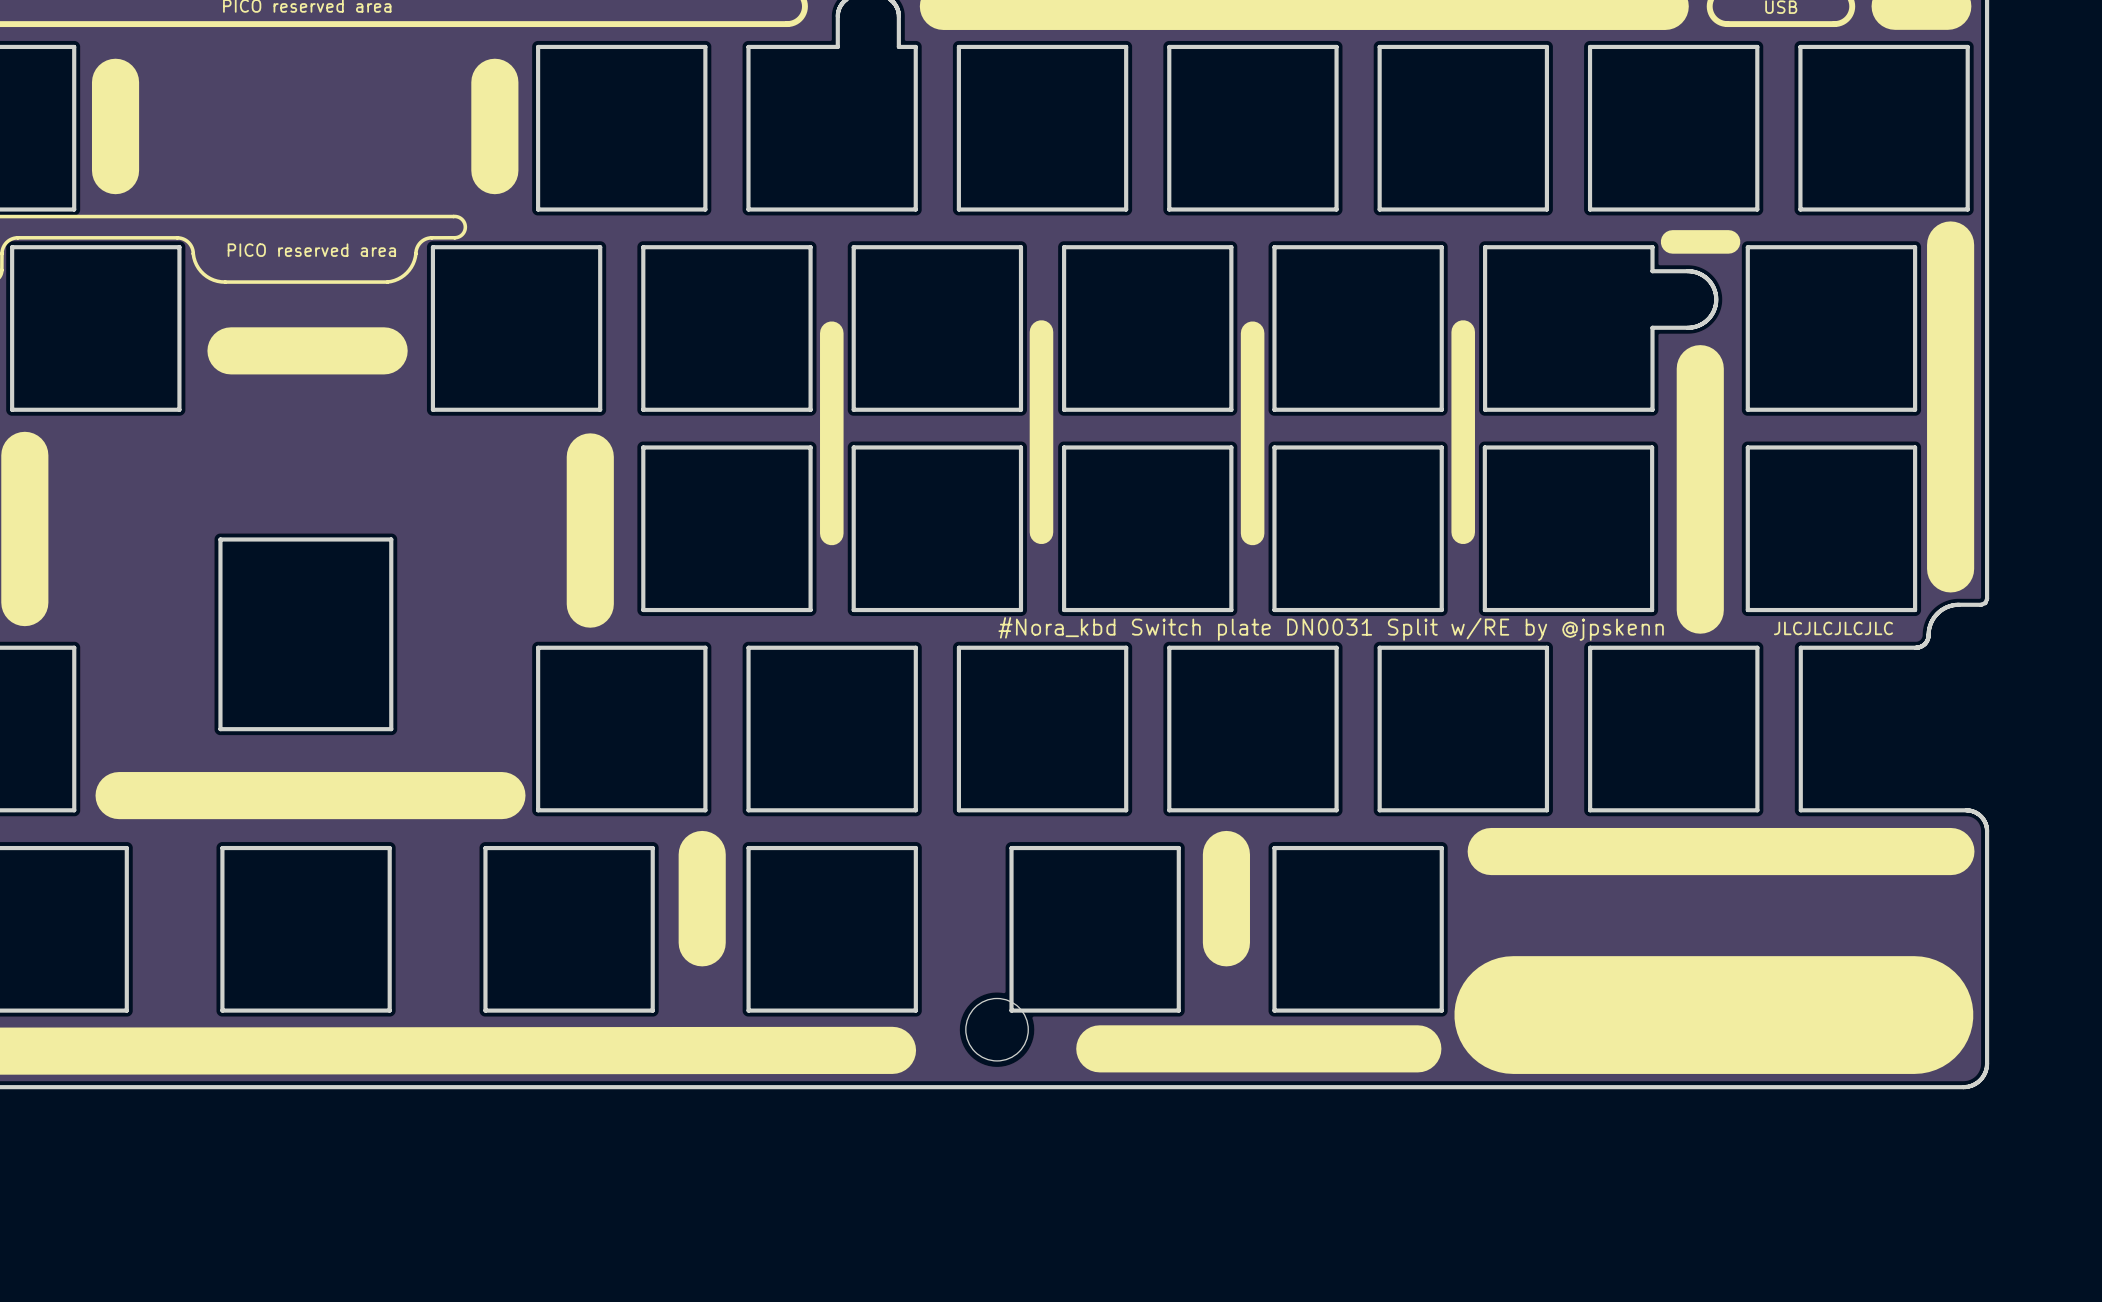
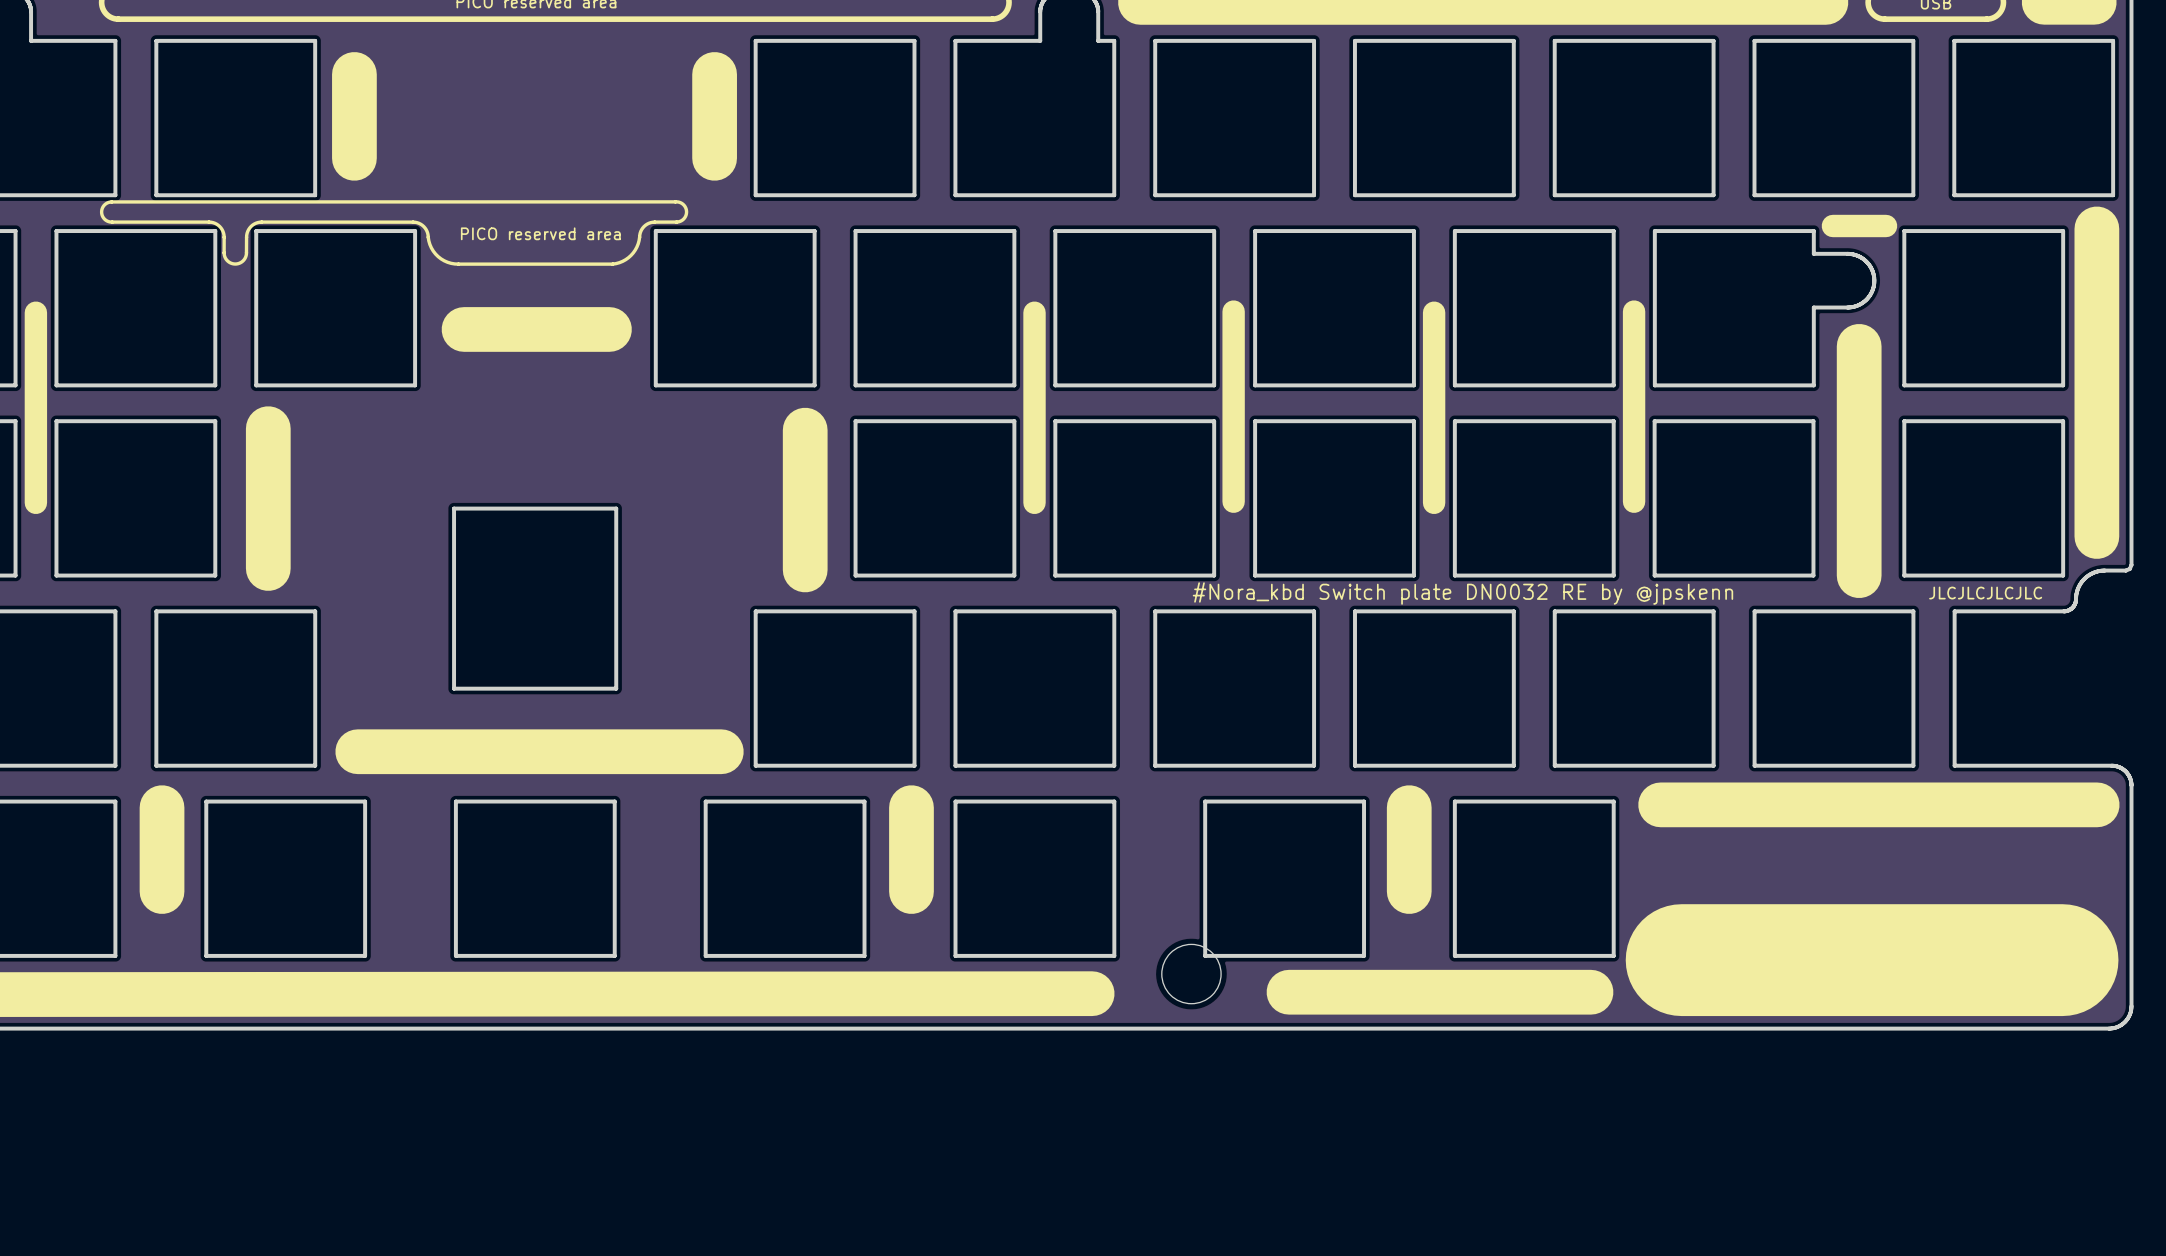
text: #Nora_kbd Switch plate DN0031 Split w/RE by @jpskenn (1331, 628) -> #Nora_kbd Switch plate DN0032 RE by @jpskenn (1462, 593)

